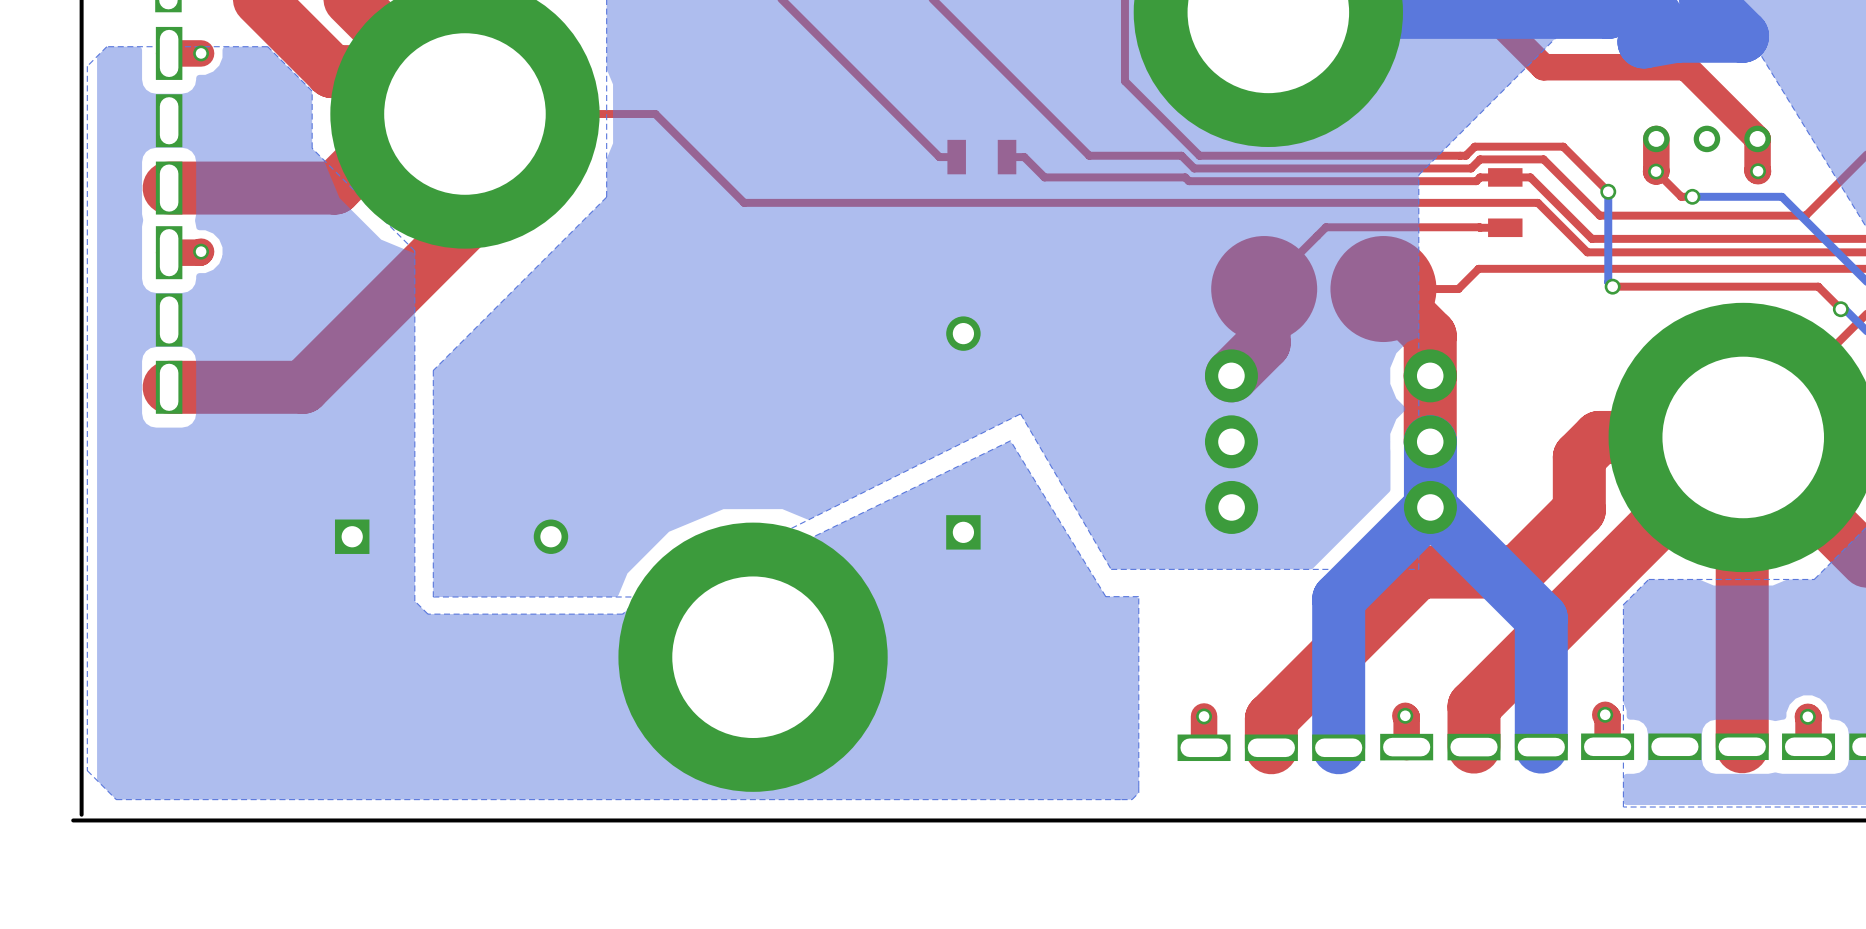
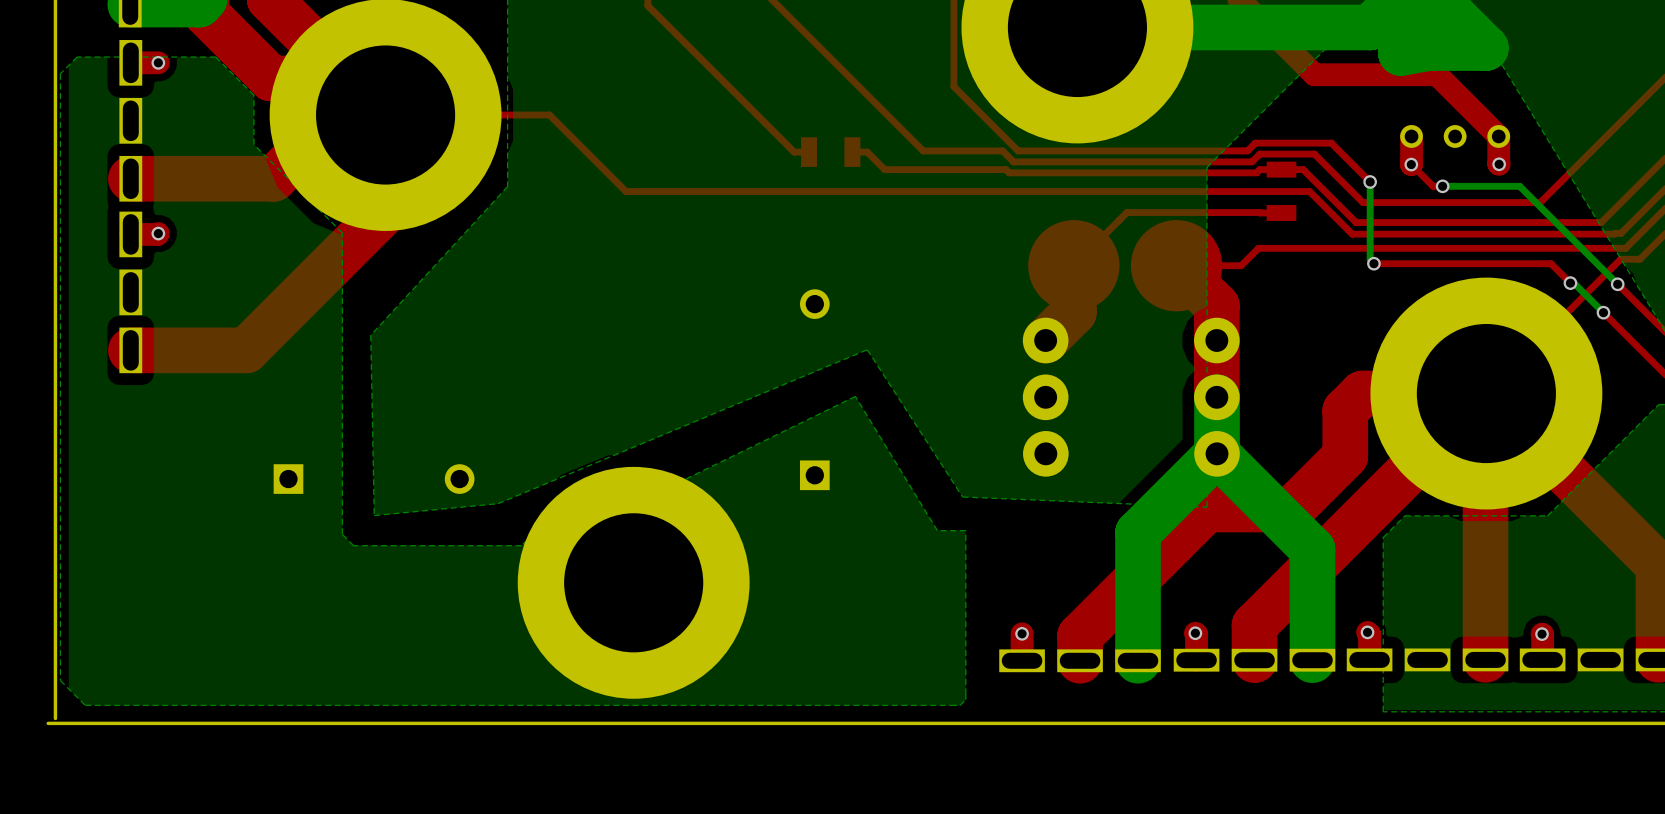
bottom zone outline: (606, 197) (433, 370) (433, 596) (654, 596) (1020, 413) (1111, 569) (1418, 569) -> (507, 186) (370, 335) (374, 515) (498, 503) (867, 349) (962, 497) (1206, 507)

